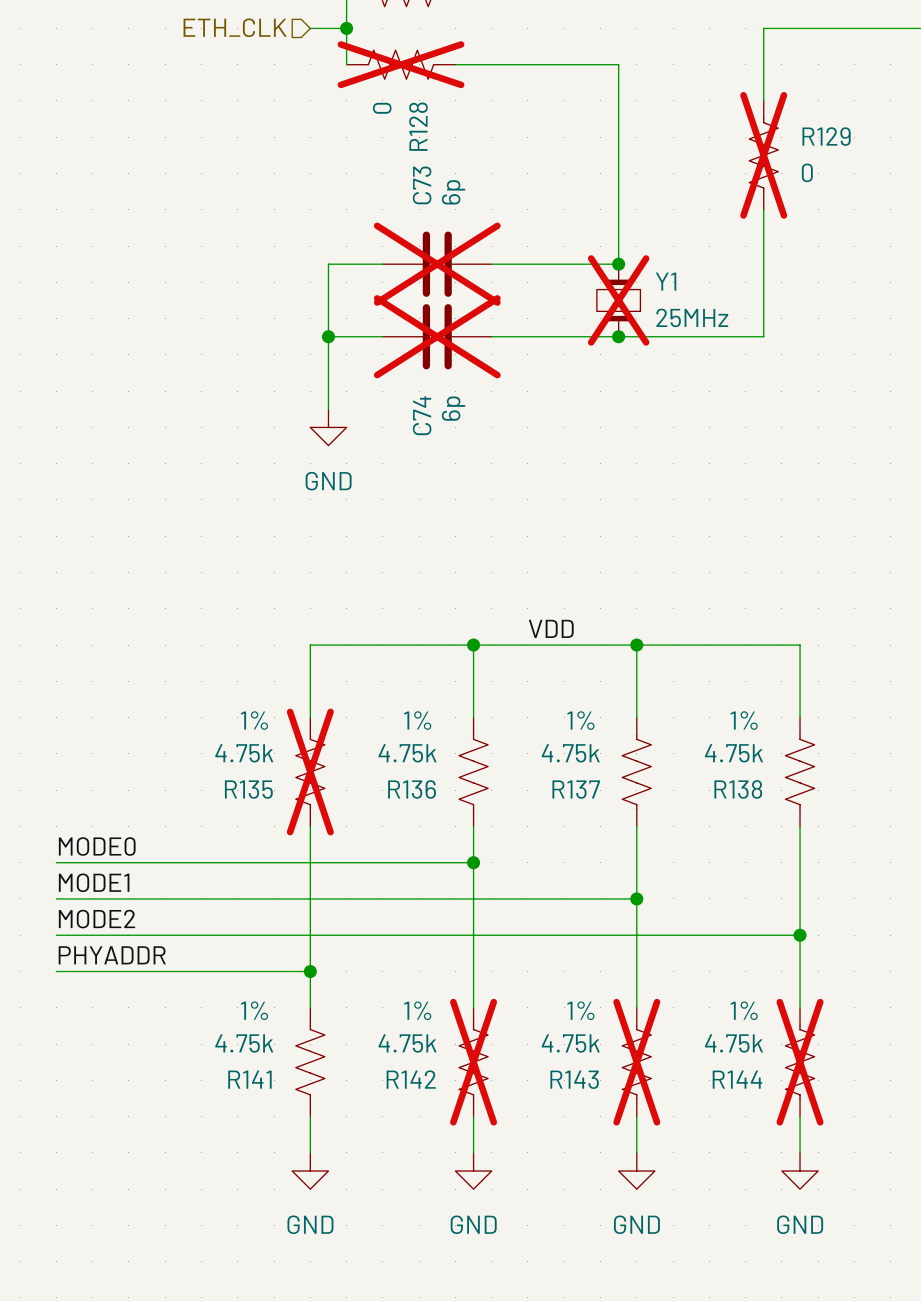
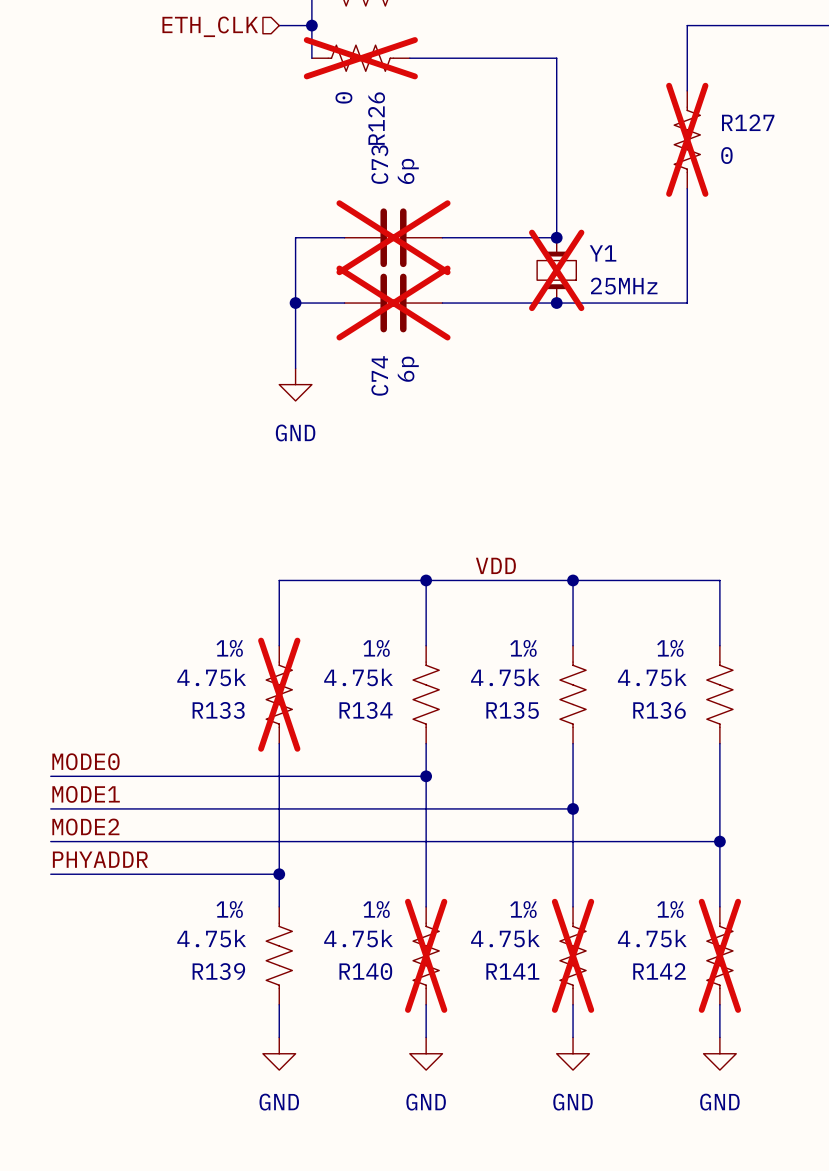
R128 name: R128 (418, 126) -> R126 (376, 118)
R129 name: R129 (826, 136) -> R127 (748, 122)
R135 name: R135 (248, 789) -> R133 (218, 710)
R136 name: R136 (412, 789) -> R134 (366, 710)
R137 name: R137 (576, 789) -> R135 (512, 710)
R138 name: R138 (738, 789) -> R136 (659, 710)
R141 name: R141 (249, 1079) -> R139 (218, 971)
R142 name: R142 (411, 1079) -> R140 (365, 971)
R143 name: R143 (574, 1079) -> R141 (512, 971)
R144 name: R144 (737, 1079) -> R142 (659, 971)

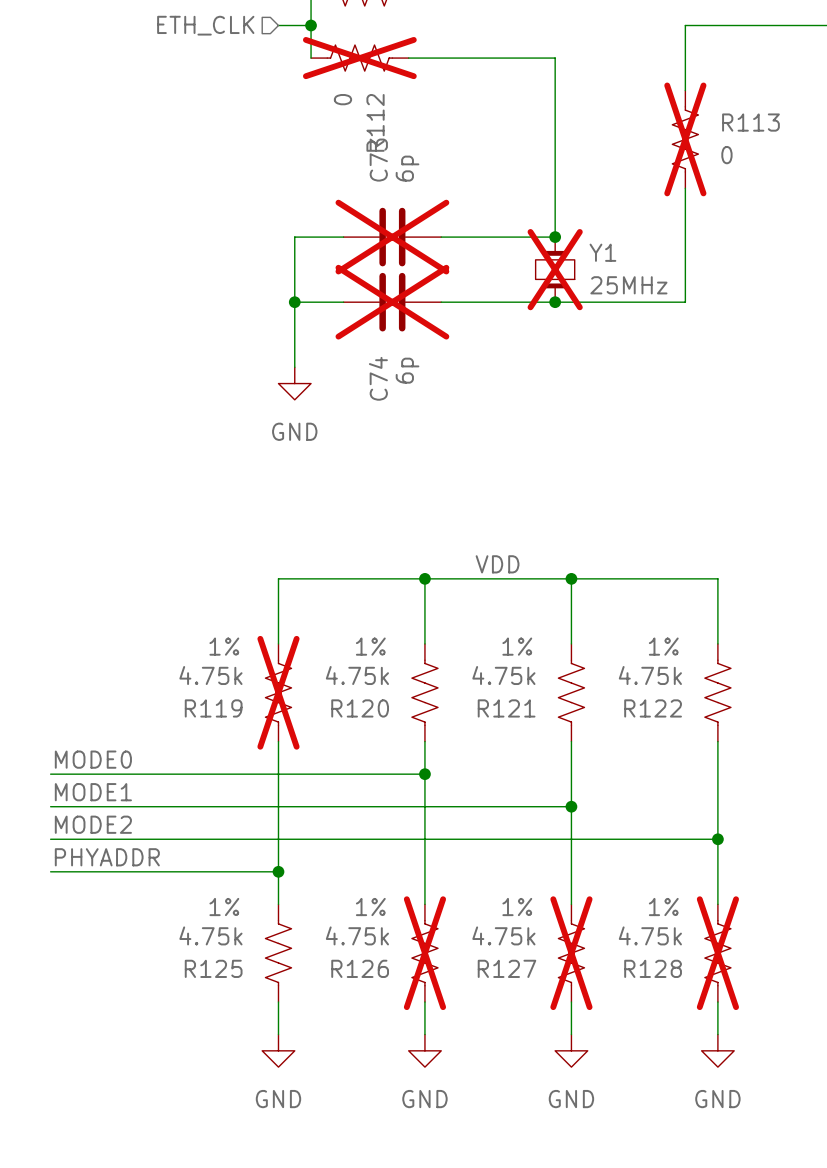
R126 name: R126 (376, 118) -> R112 (375, 122)
R127 name: R127 (748, 122) -> R113 (750, 122)
R133 name: R133 (218, 710) -> R119 (213, 708)
R134 name: R134 (366, 710) -> R120 (360, 708)
R135 name: R135 (512, 710) -> R121 (506, 708)
R136 name: R136 (659, 710) -> R122 (653, 708)
R139 name: R139 (218, 971) -> R125 (213, 968)
R140 name: R140 (365, 971) -> R126 (360, 968)
R141 name: R141 (512, 971) -> R127 (506, 968)
R142 name: R142 (659, 971) -> R128 (653, 968)

